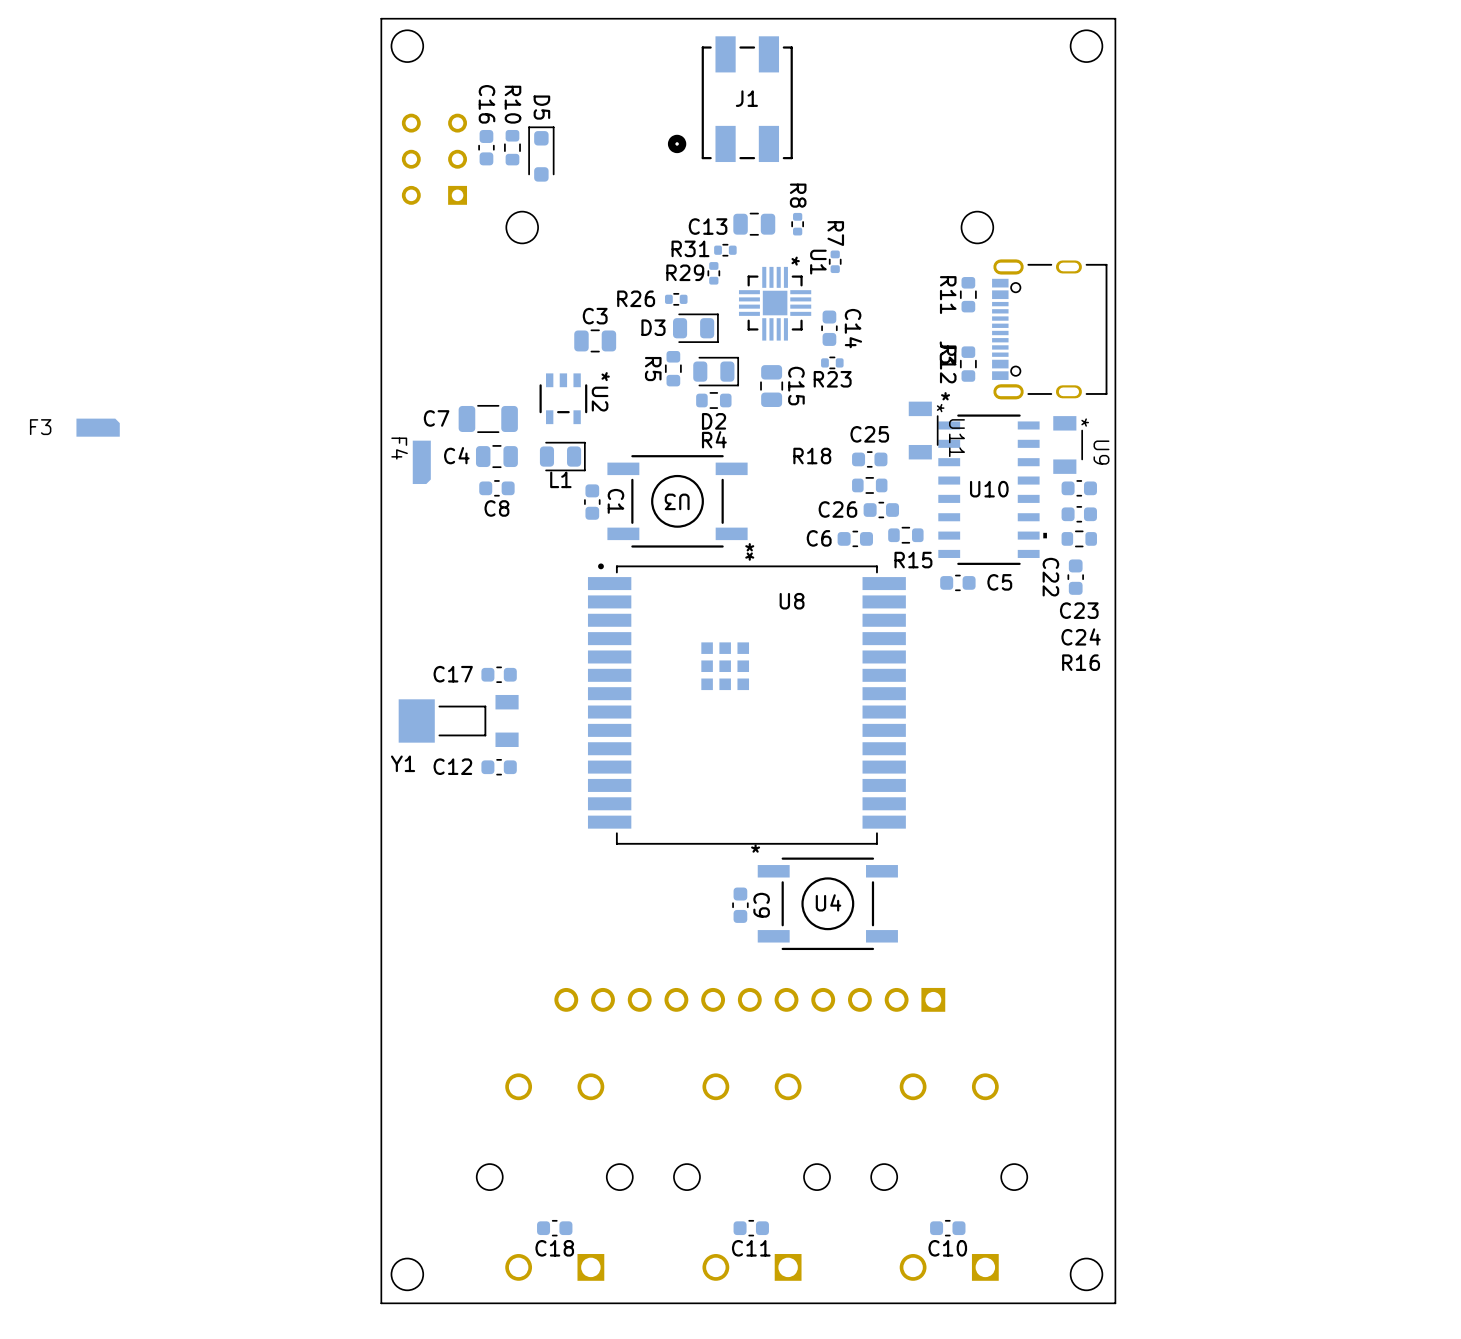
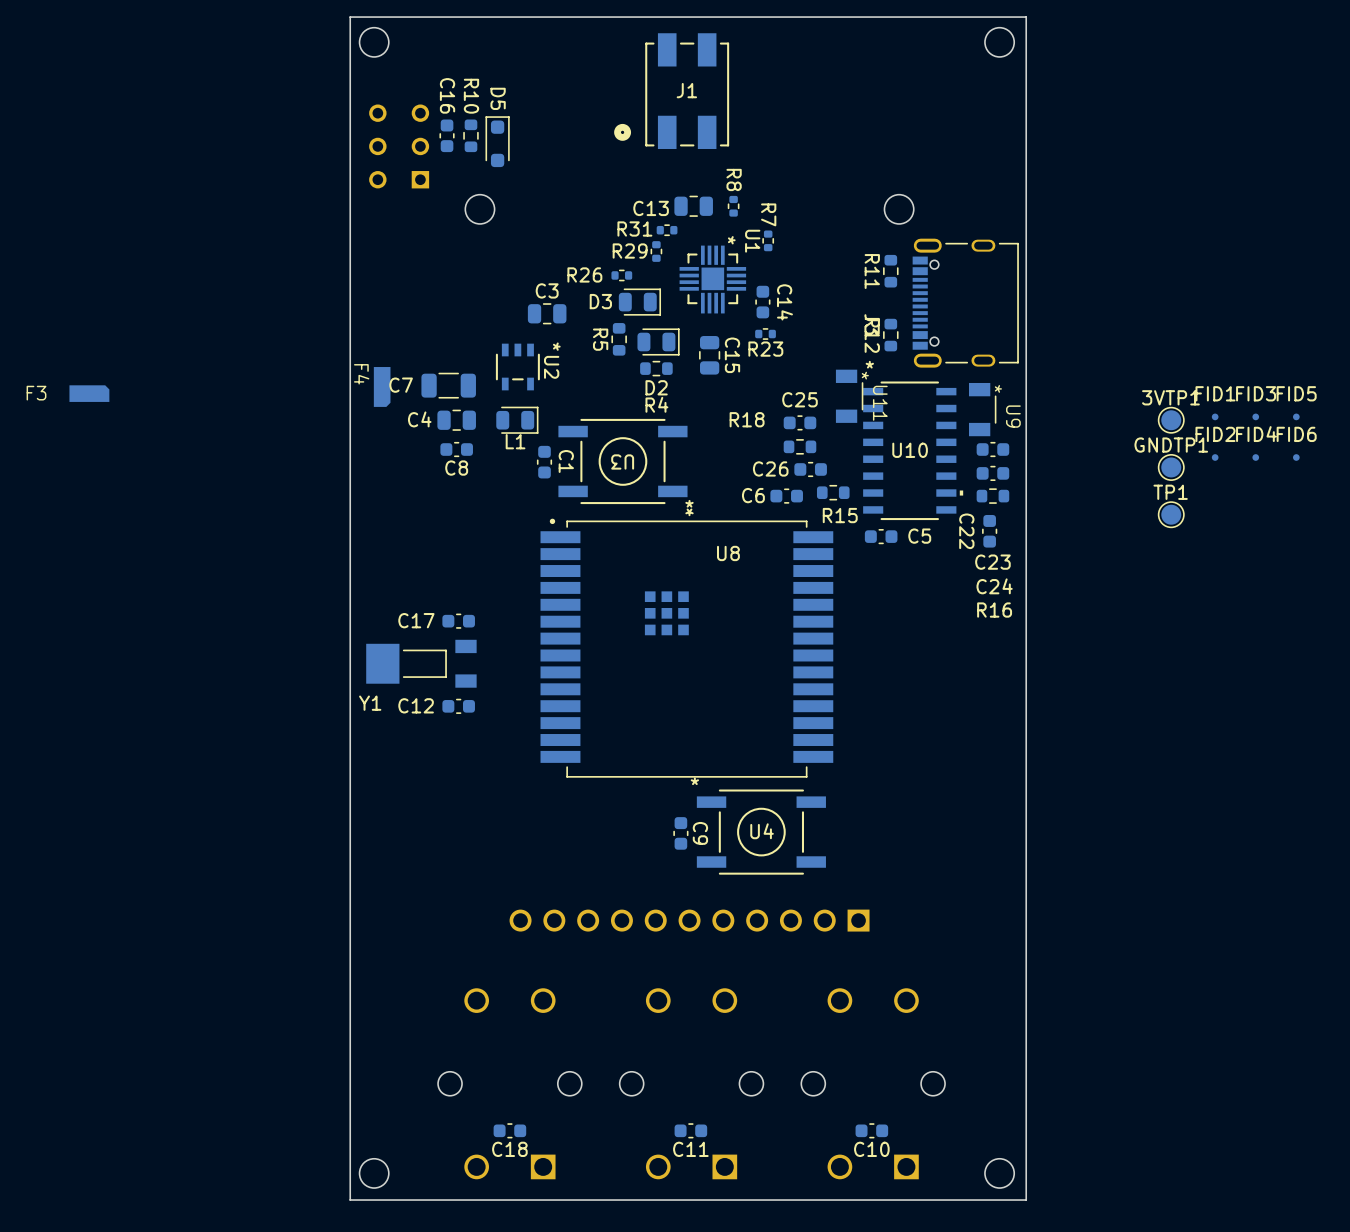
FID1: none -> (1215, 416)
FID3: none -> (1255, 416)
FID5: none -> (1296, 416)
3VTP1: none -> (1171, 420)
F4 position: (421, 462) -> (382, 386)
FID2: none -> (1215, 457)
FID4: none -> (1255, 457)
FID6: none -> (1296, 457)
GNDTP1: none -> (1171, 467)
TP1: none -> (1171, 514)

